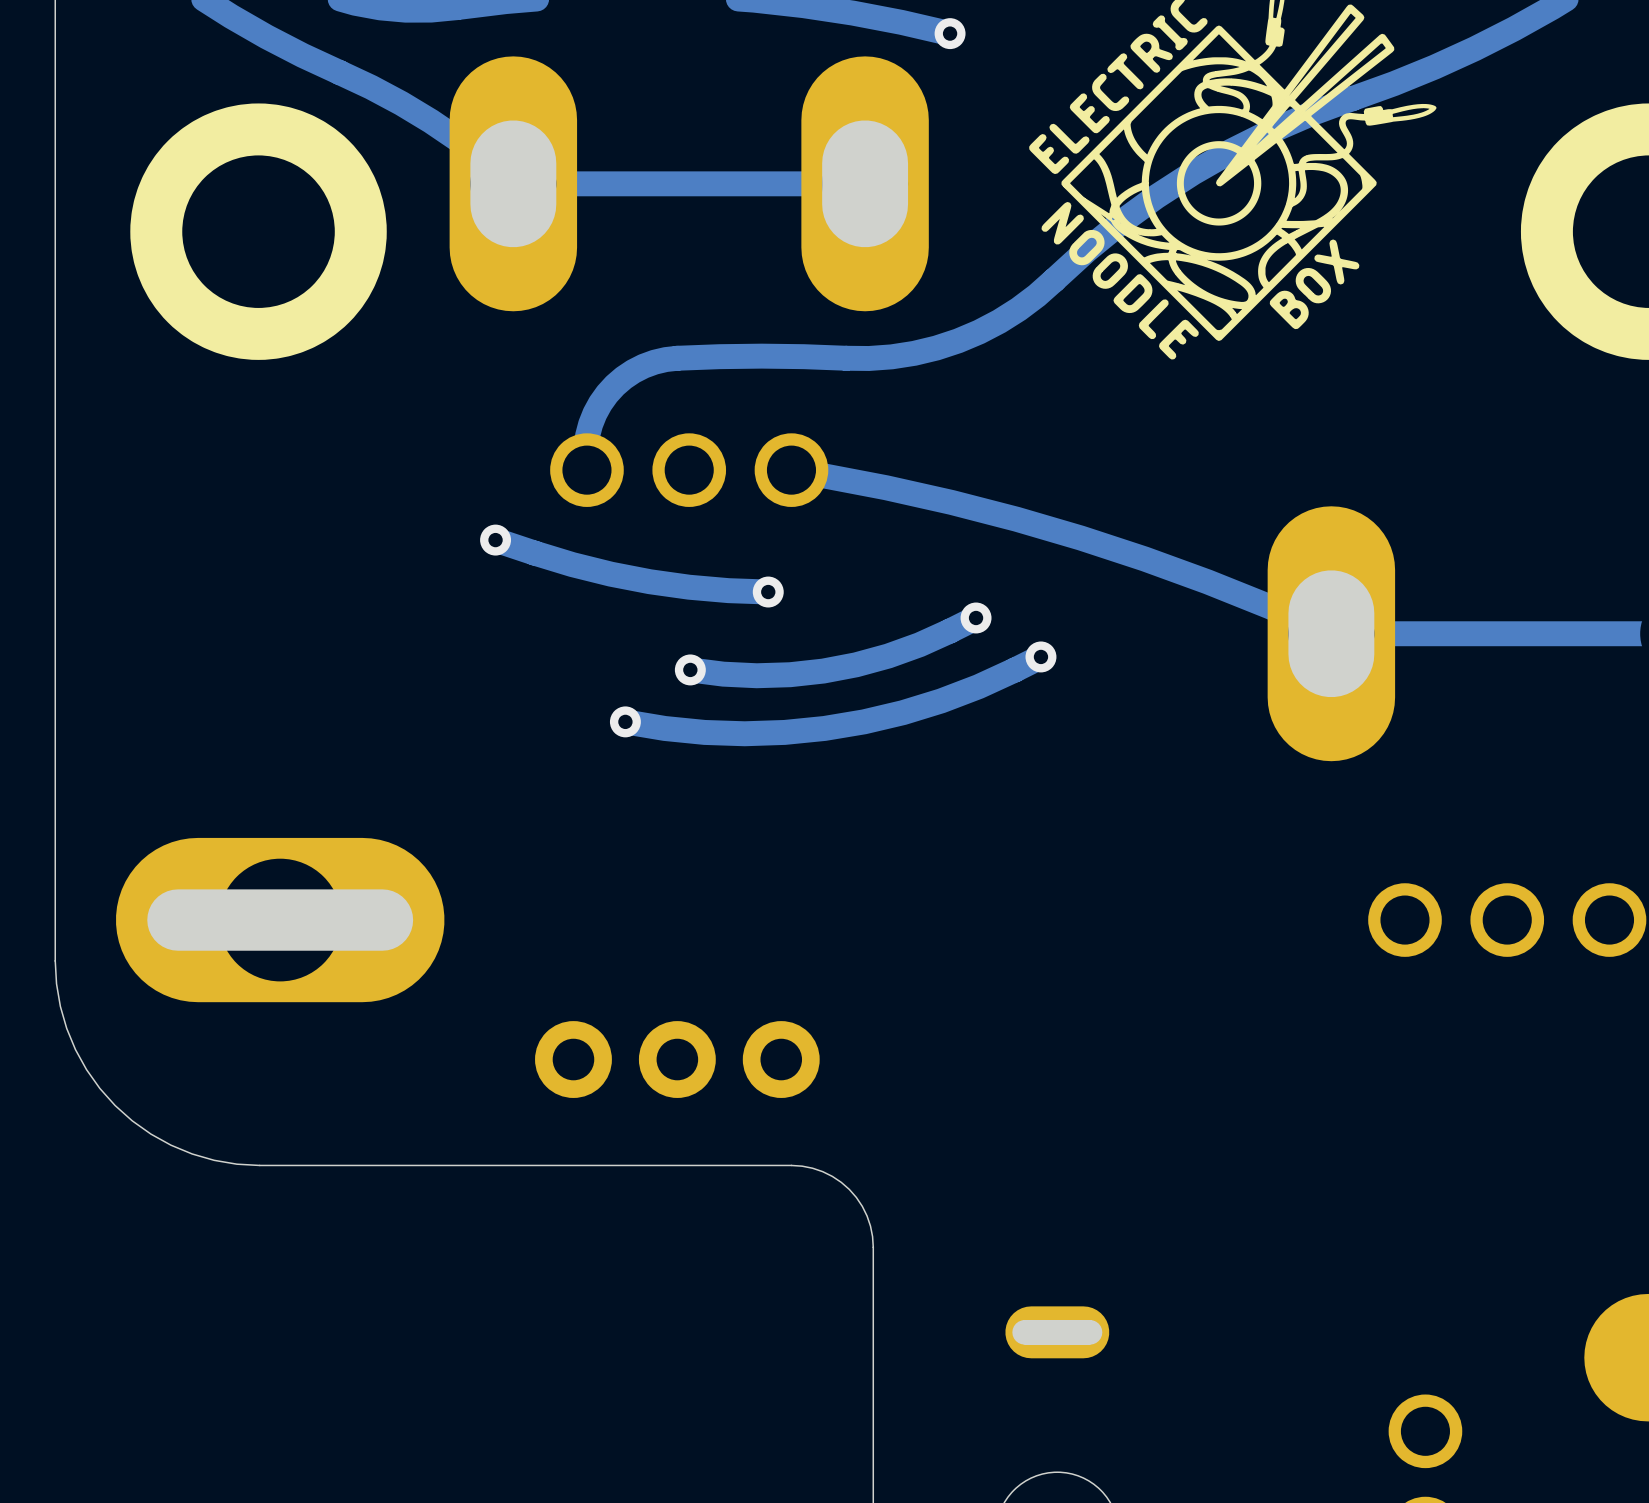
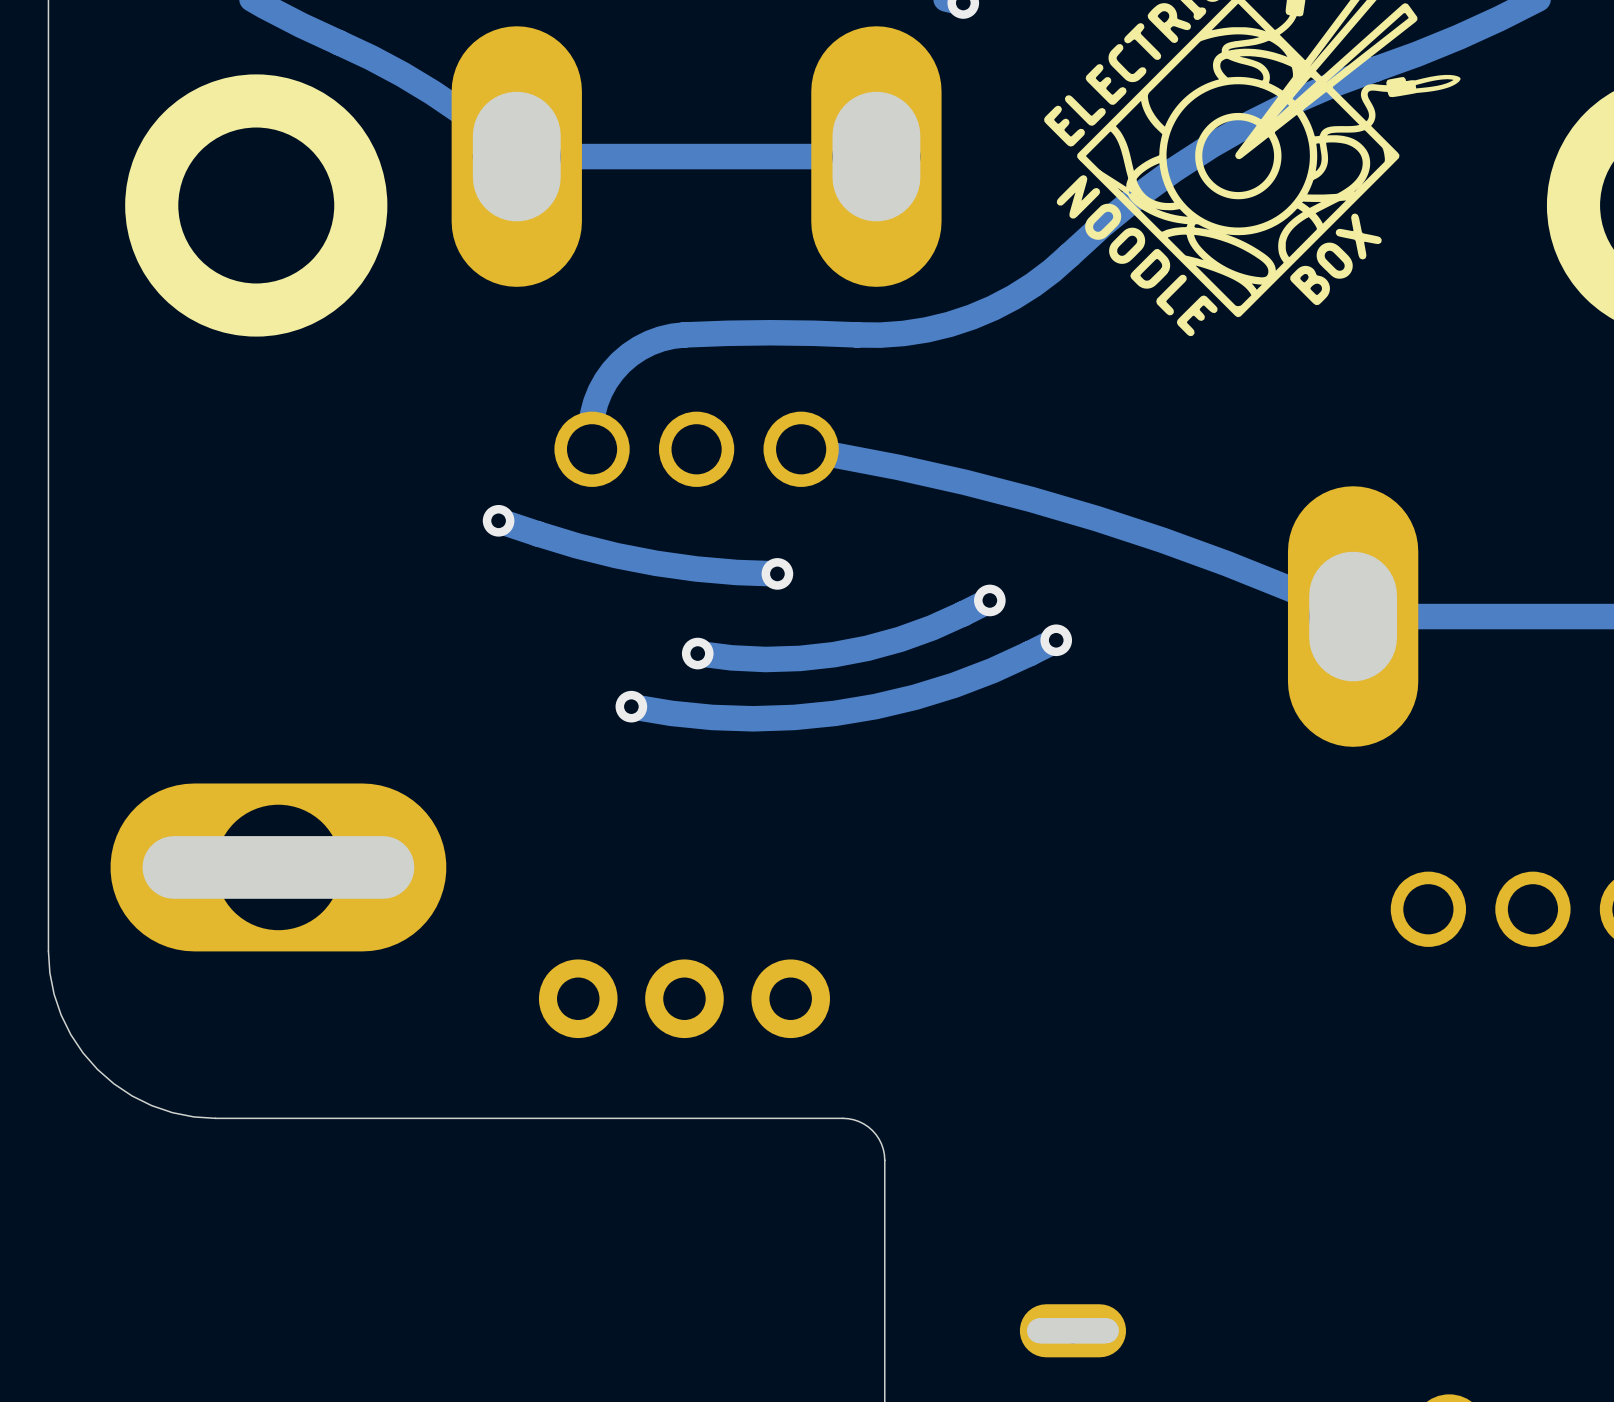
part position: (280, 920) -> (278, 867)
board edge: (55, 960) (56, 983) (66, 1028) (86, 1069) (99, 1088) (132, 1120) (150, 1134) (192, 1153) (236, 1164) (259, 1165) (802, 1166) (832, 1176) (856, 1197) (867, 1215) (873, 1247) -> (48, 951) (54, 994) (70, 1034) (97, 1069) (113, 1083) (151, 1105) (193, 1116) (215, 1118) (848, 1118) (868, 1126) (876, 1134) (883, 1149) (884, 1243)
part position: (677, 1059) -> (684, 998)

